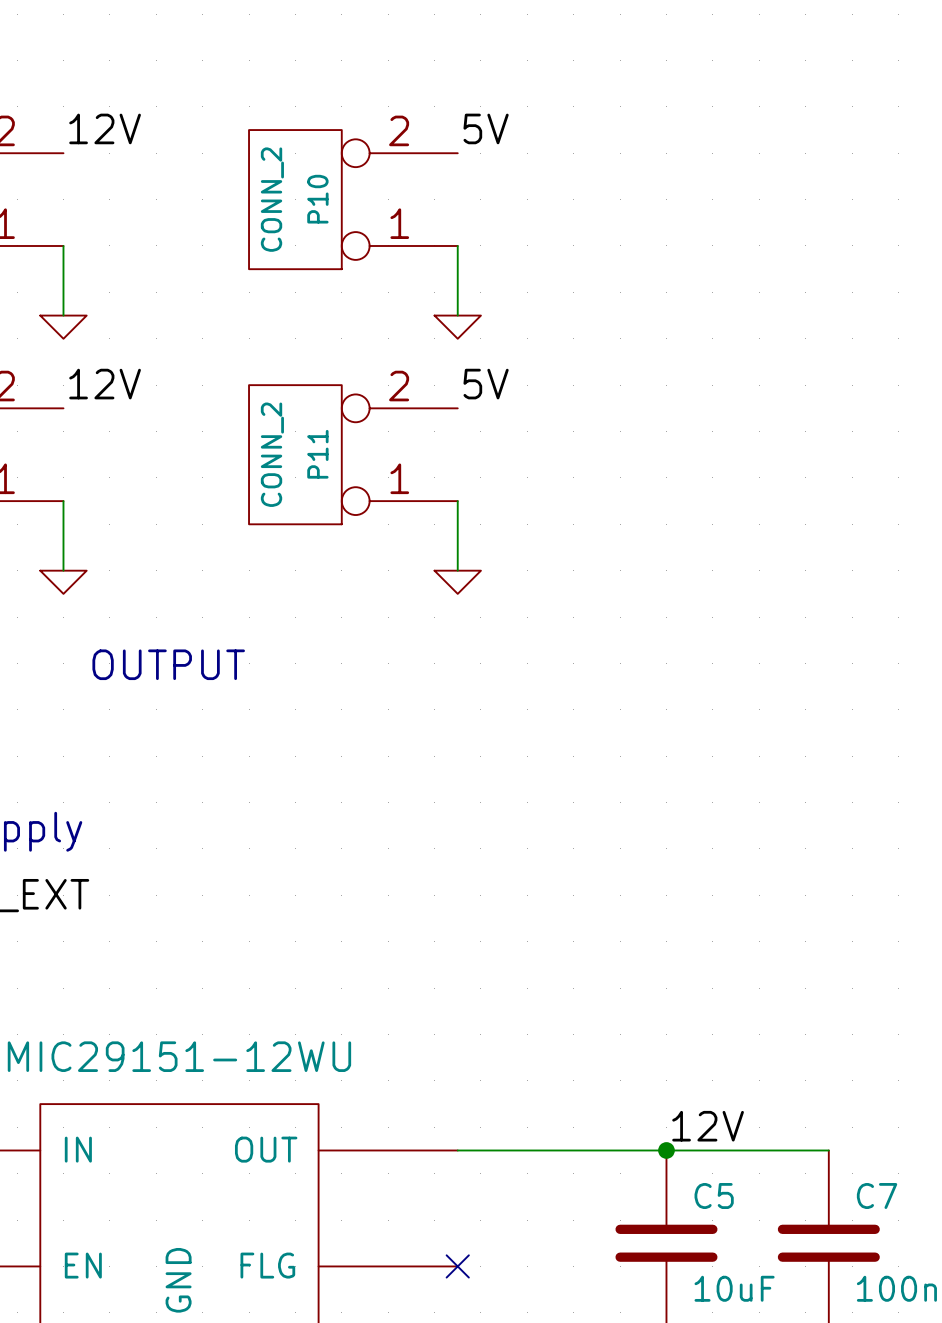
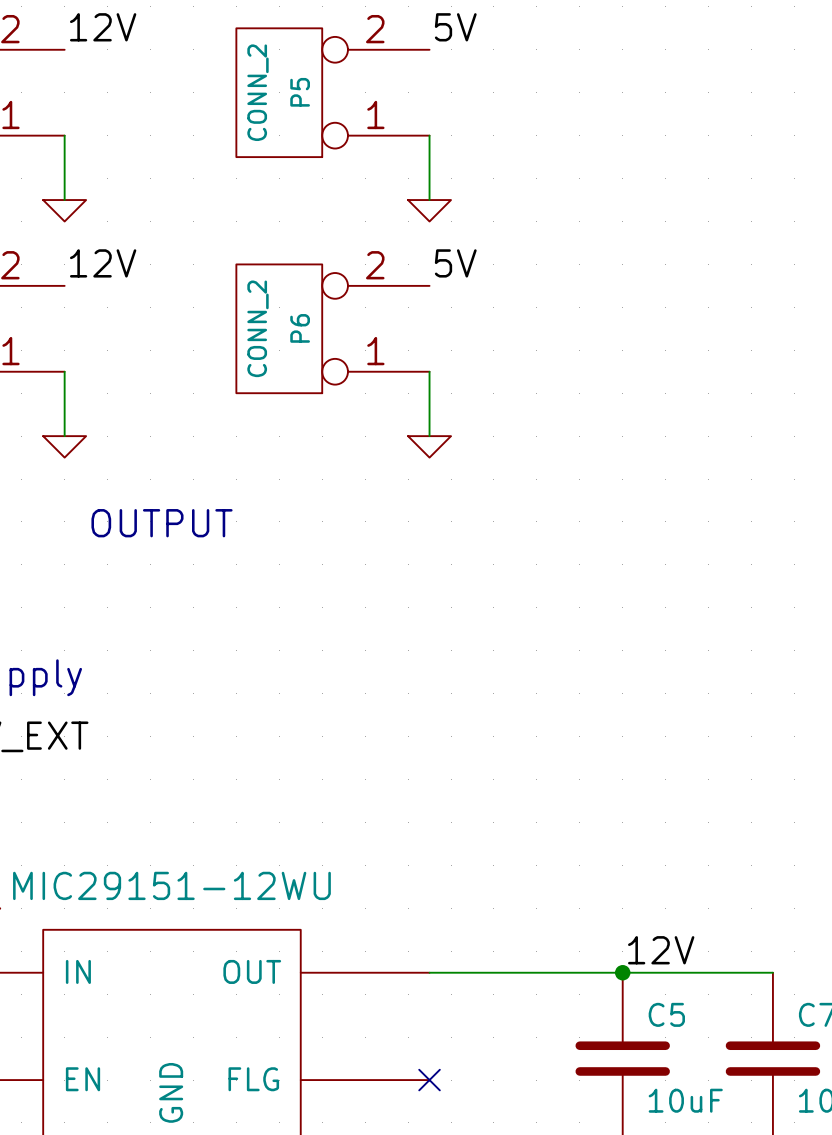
P10 name: P10 (317, 199) -> P5 (300, 92)
P11 name: P11 (317, 454) -> P6 (300, 328)

